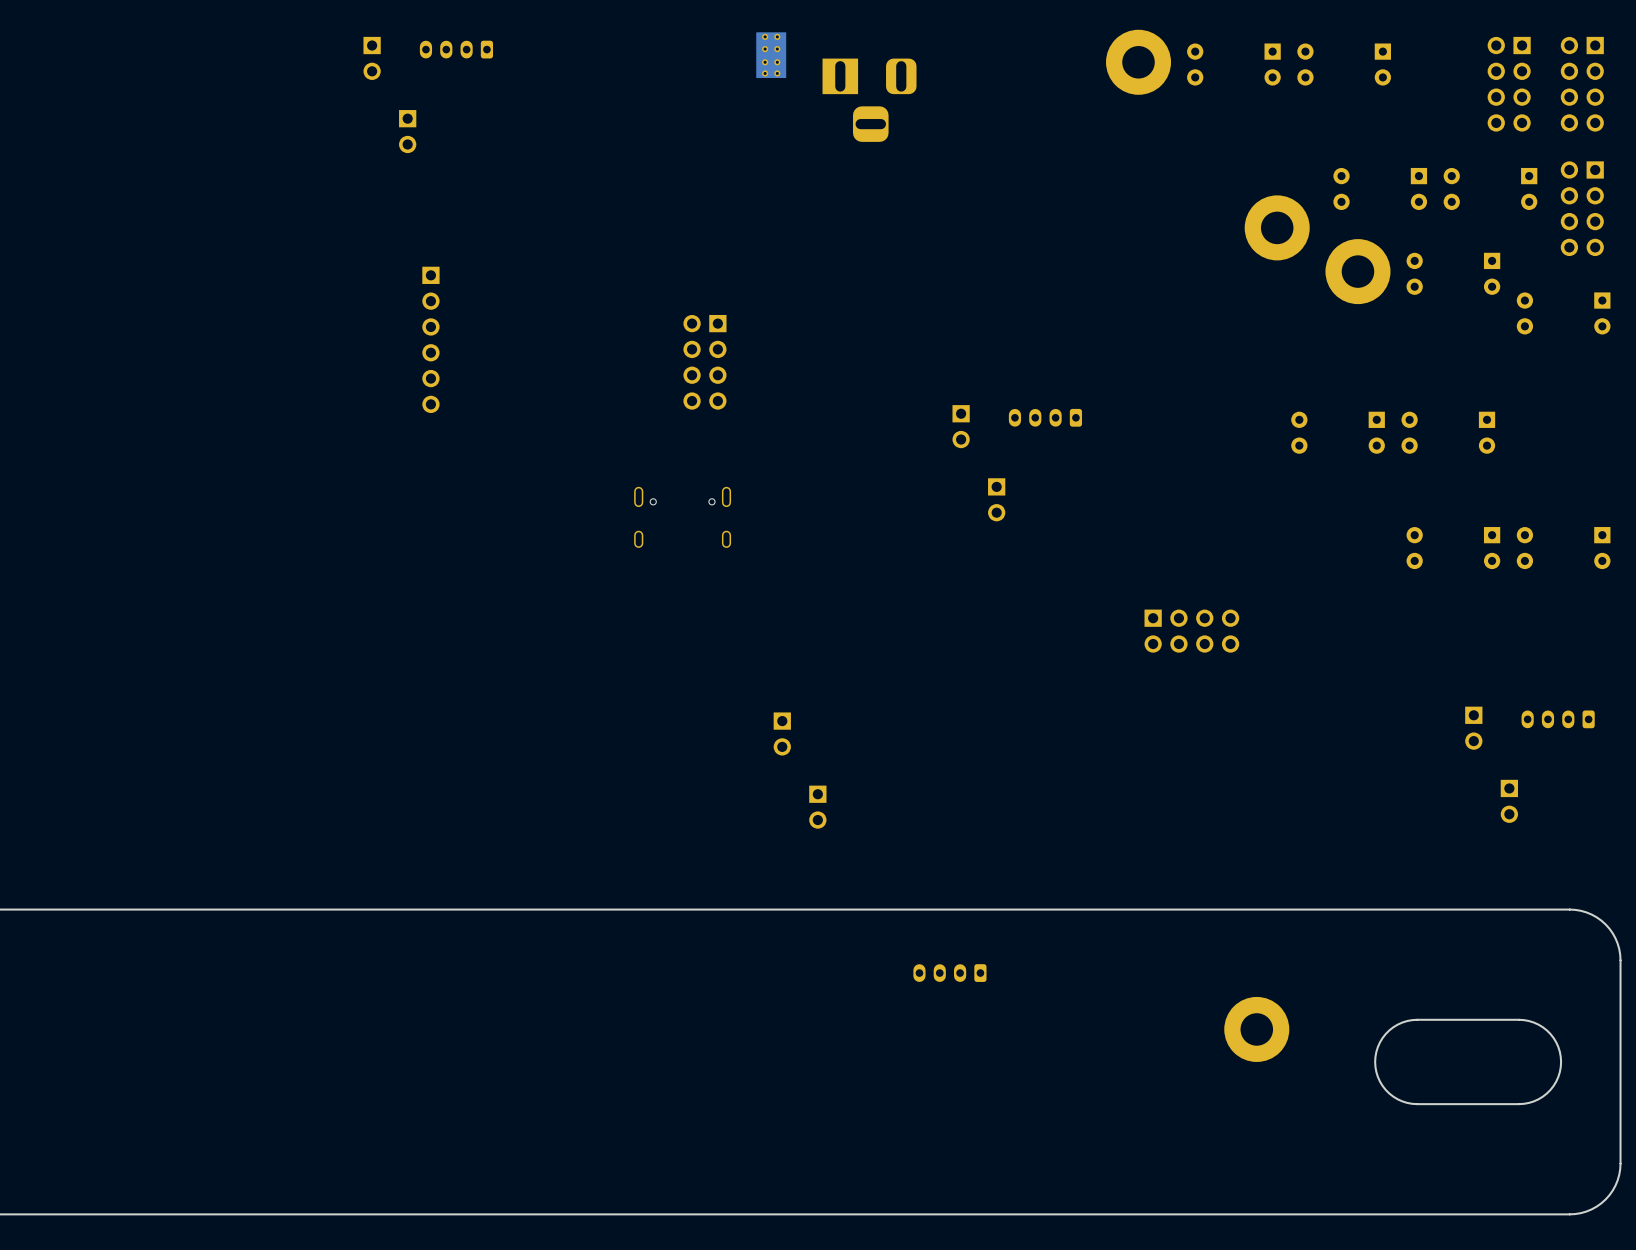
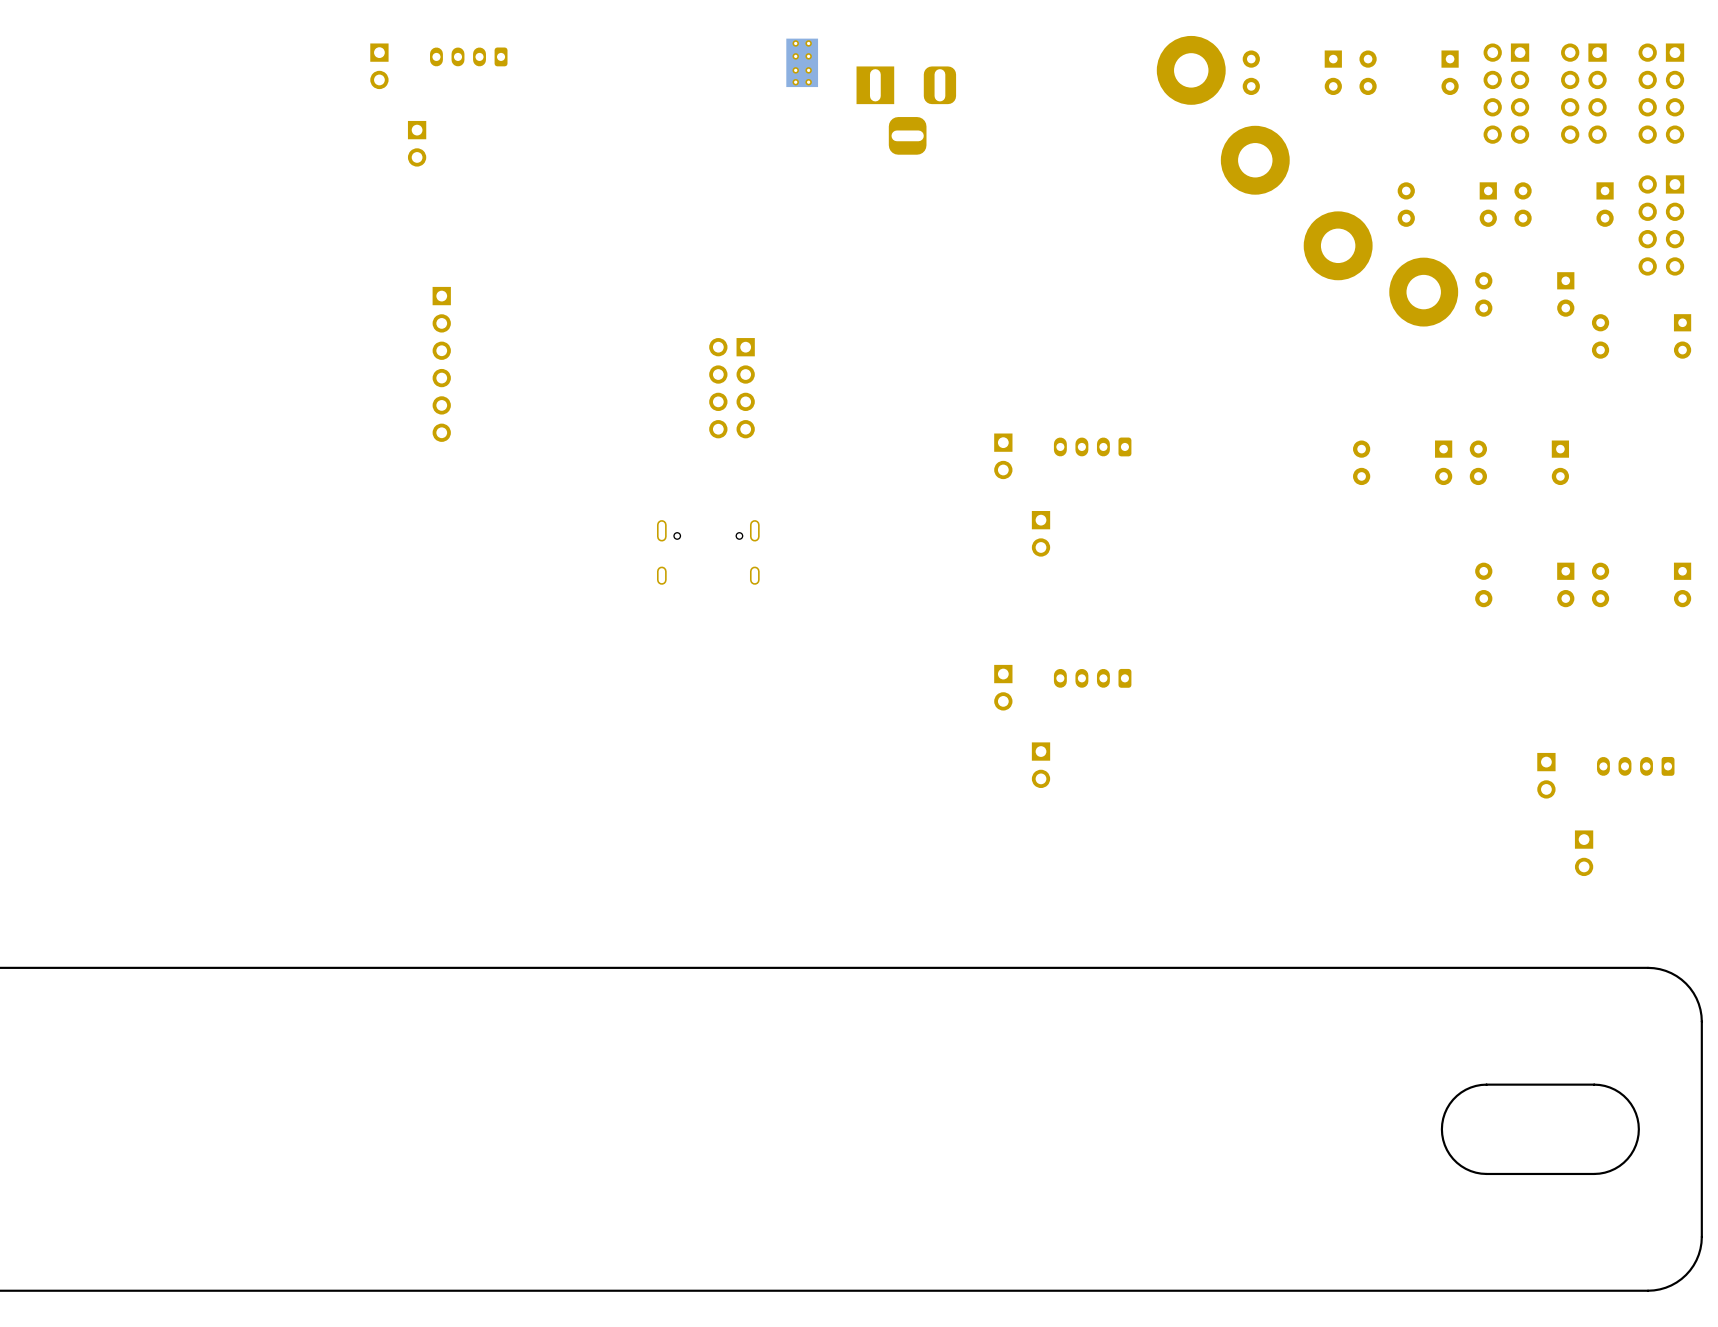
part: none -> (1506, 93)
part: none -> (1255, 160)
part: (1191, 631) -> none
part: none -> (1092, 678)
part: none -> (1003, 687)
part: none -> (1041, 765)
part: (782, 733) -> none
part: (817, 807) -> none
part: (949, 973) -> none
part: (1256, 1029) -> none

